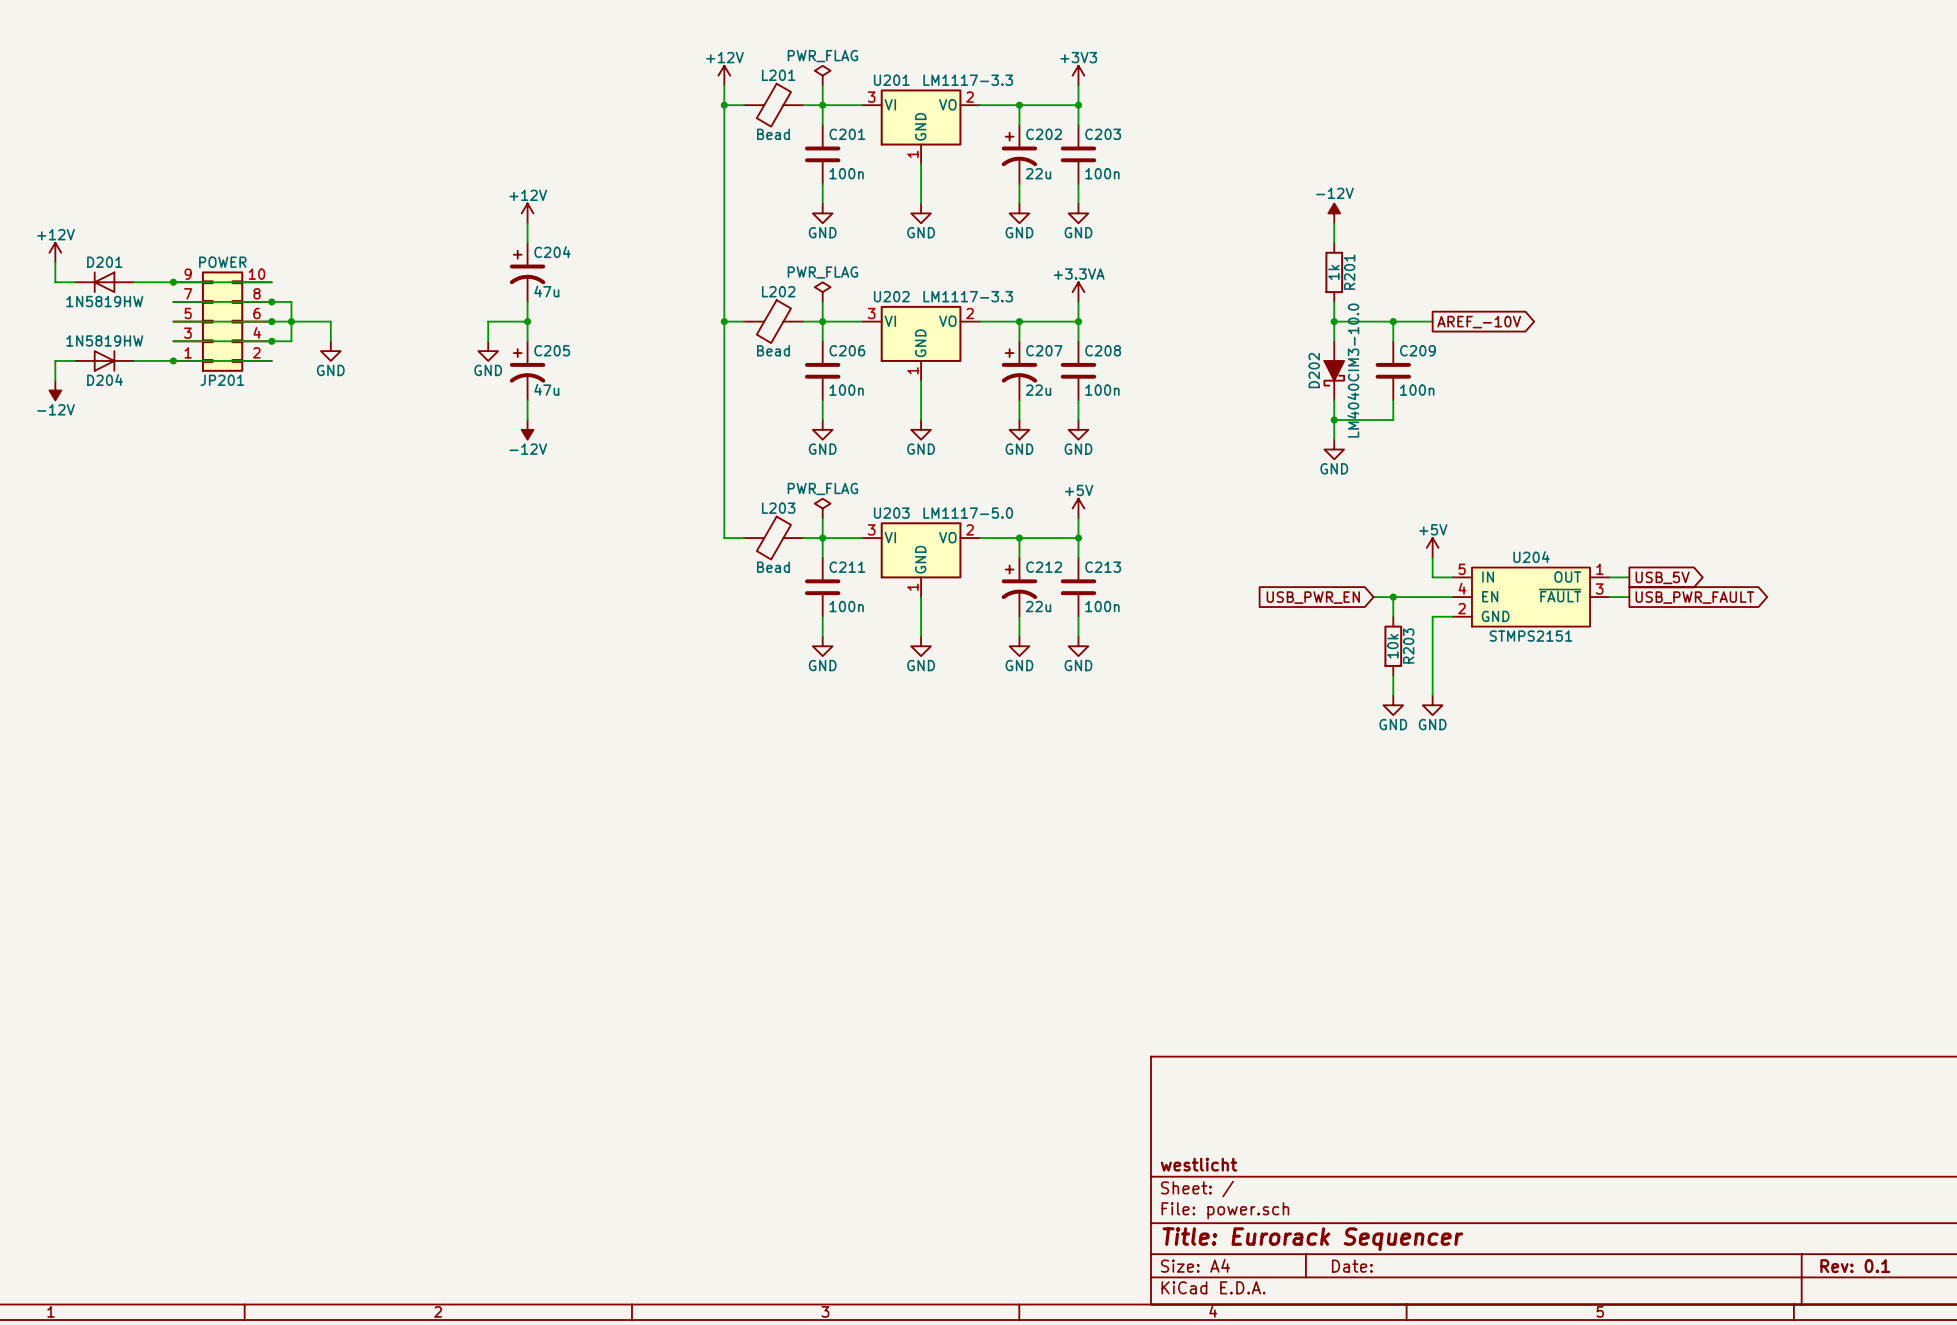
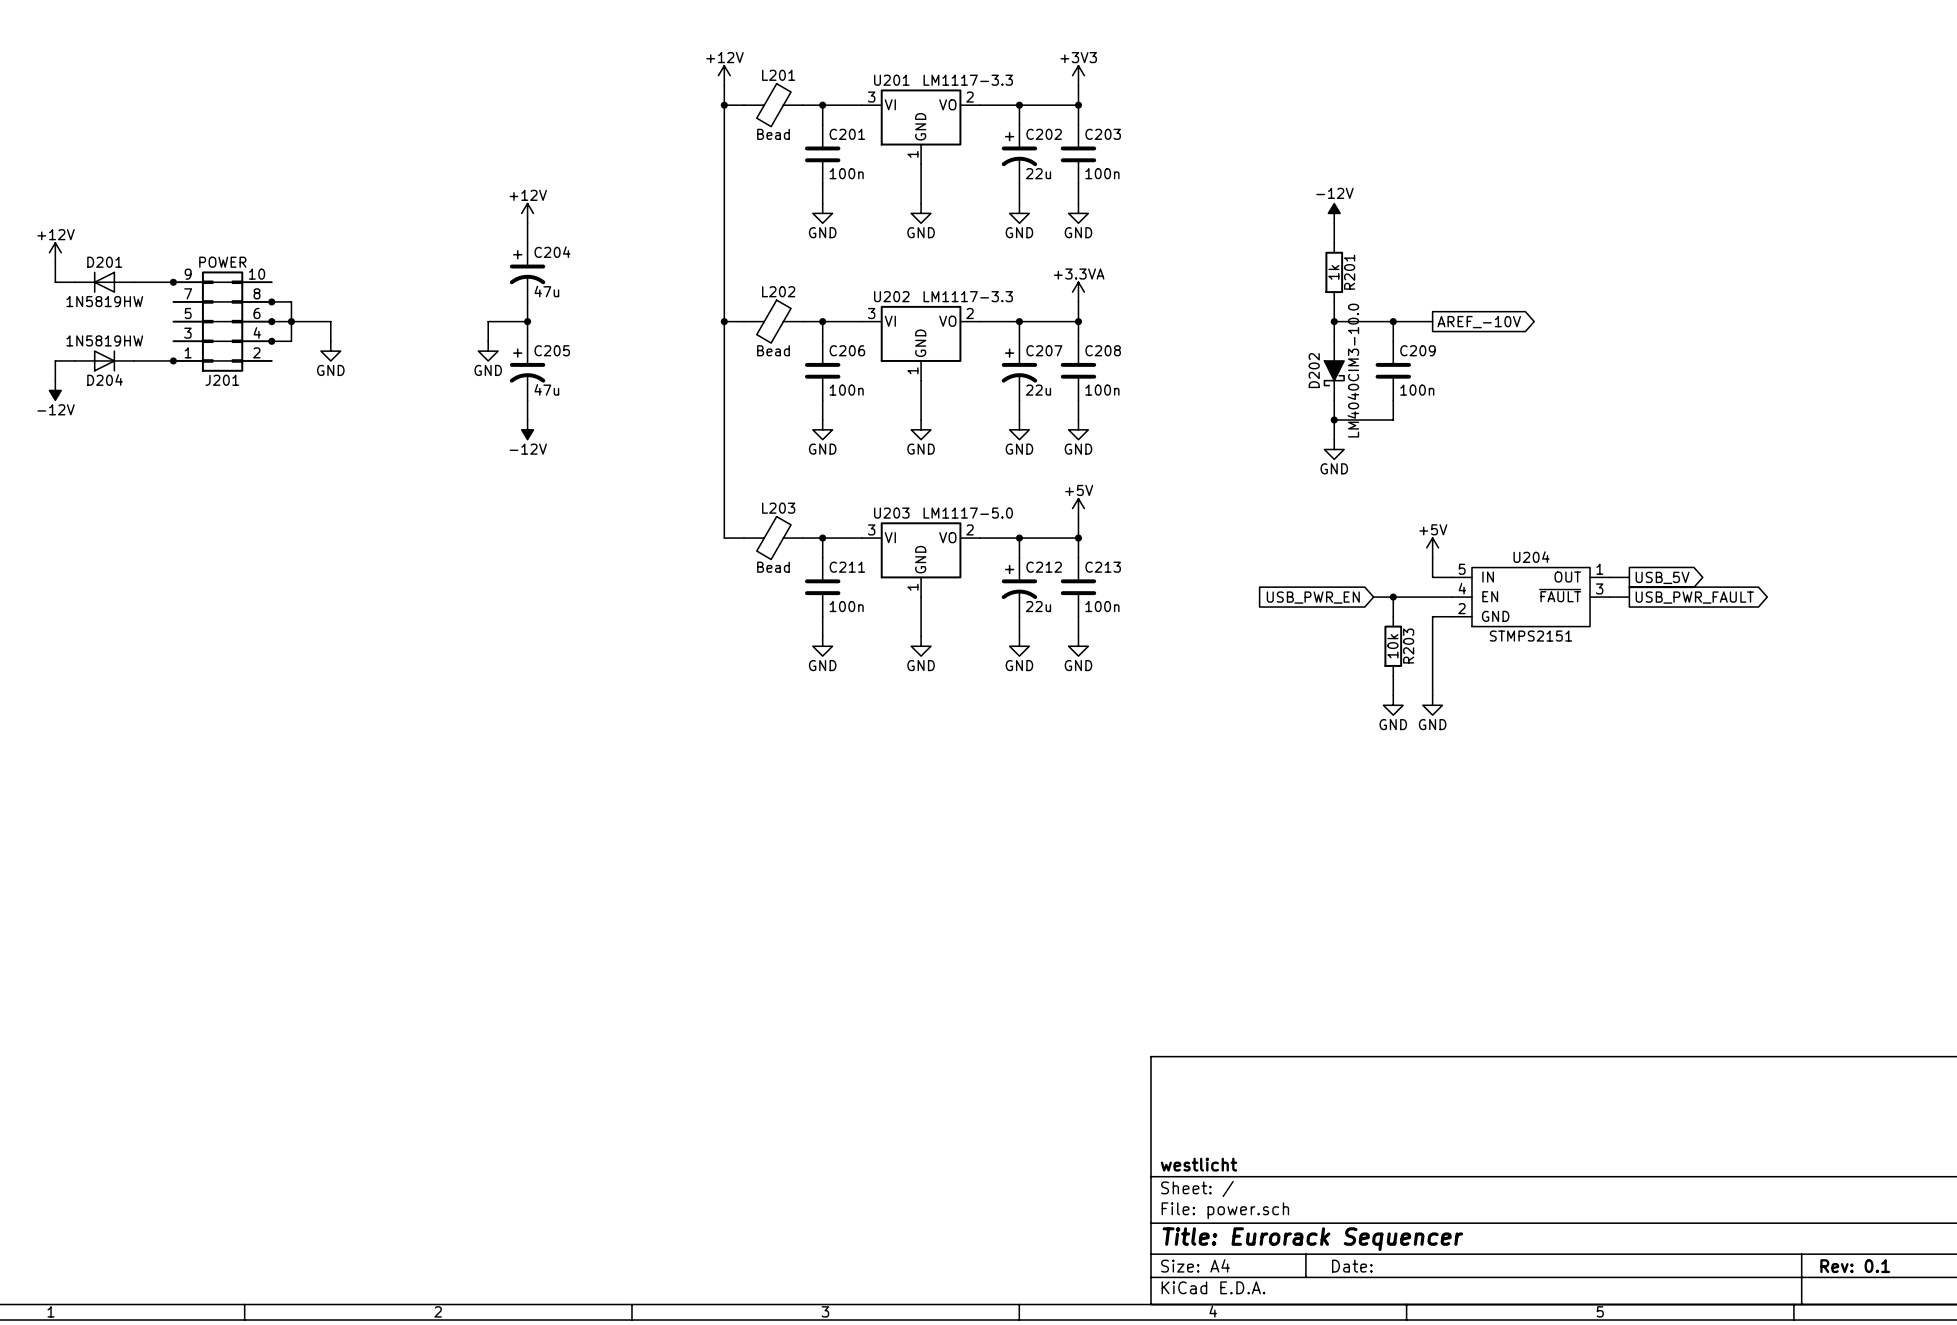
power symbol: PWR_FLAG (822, 75) -> none
wire: (822, 85) (822, 105) -> none
power symbol: PWR_FLAG (822, 292) -> none
wire: (822, 301) (822, 321) -> none
JP201 name: JP201 (222, 380) -> J201 (222, 380)
power symbol: PWR_FLAG (822, 508) -> none
wire: (822, 518) (822, 538) -> none

